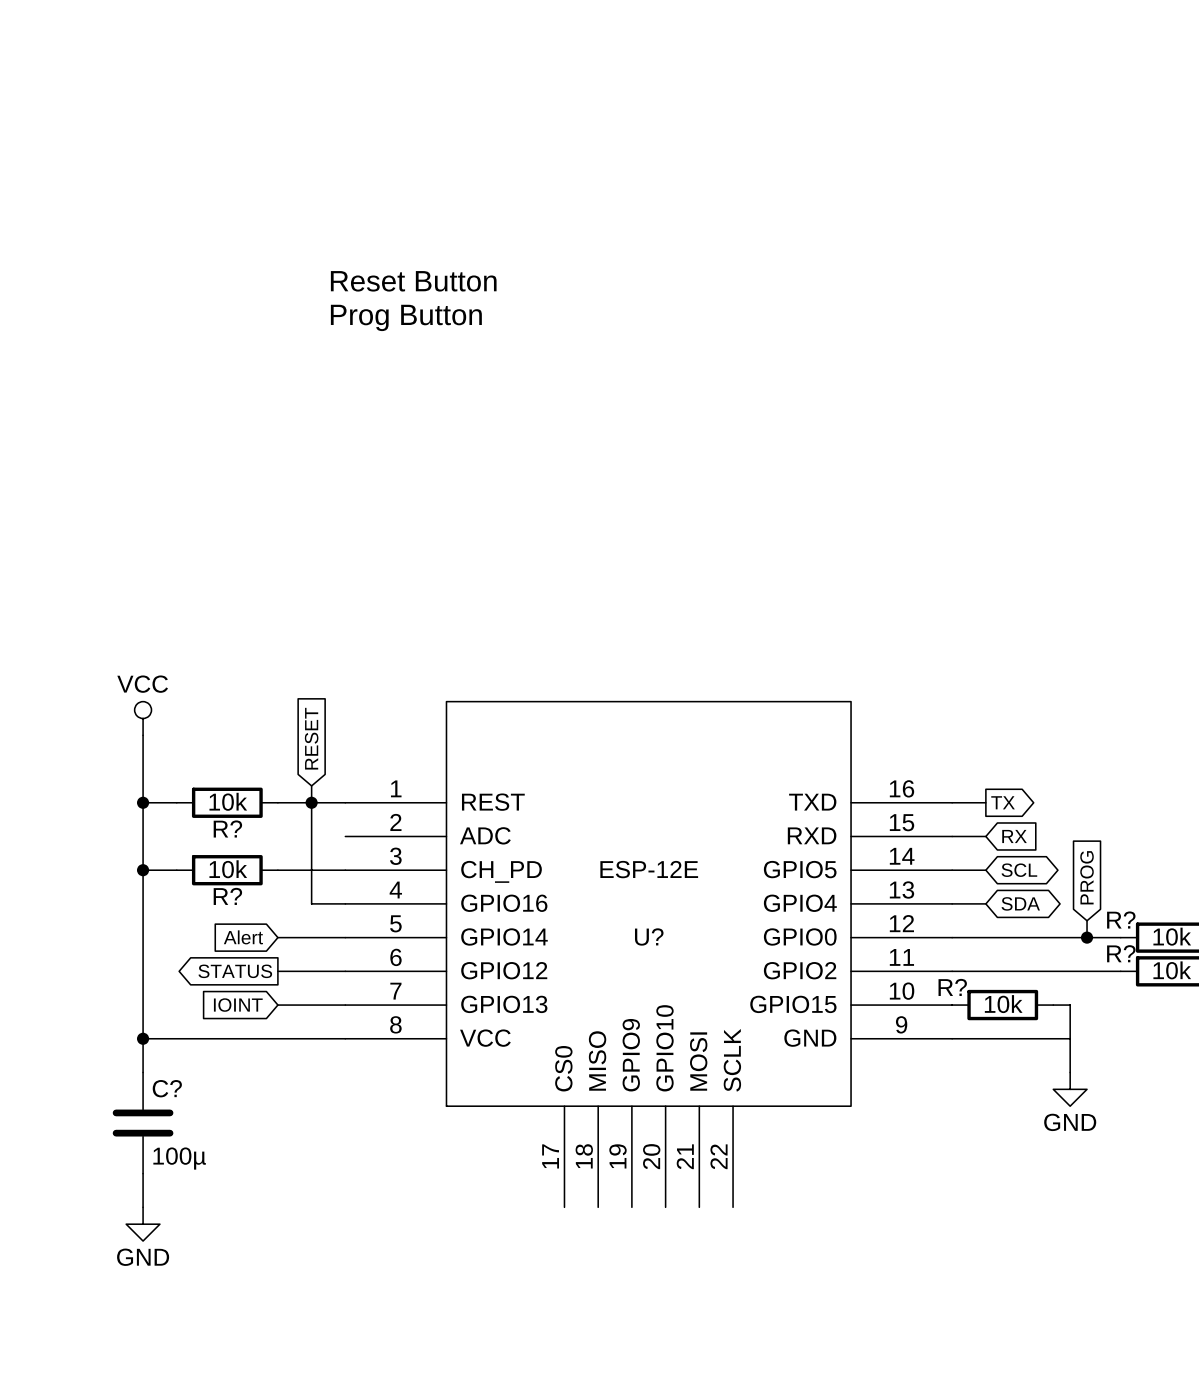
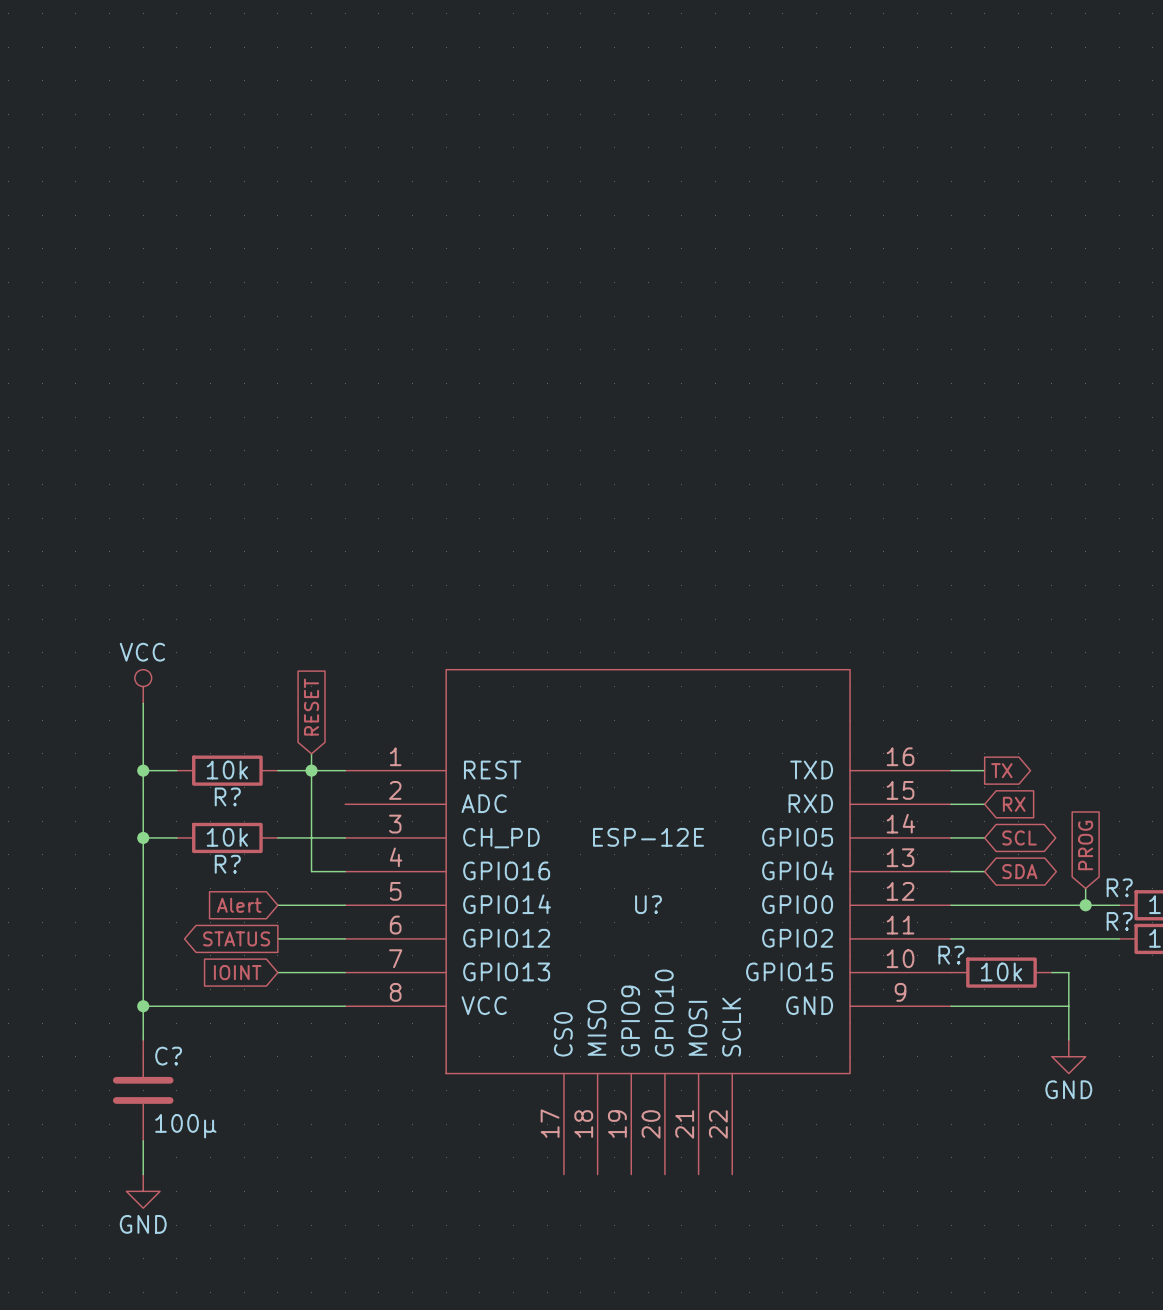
text: Reset Button (413, 281) -> none
text: Prog Button (406, 317) -> none

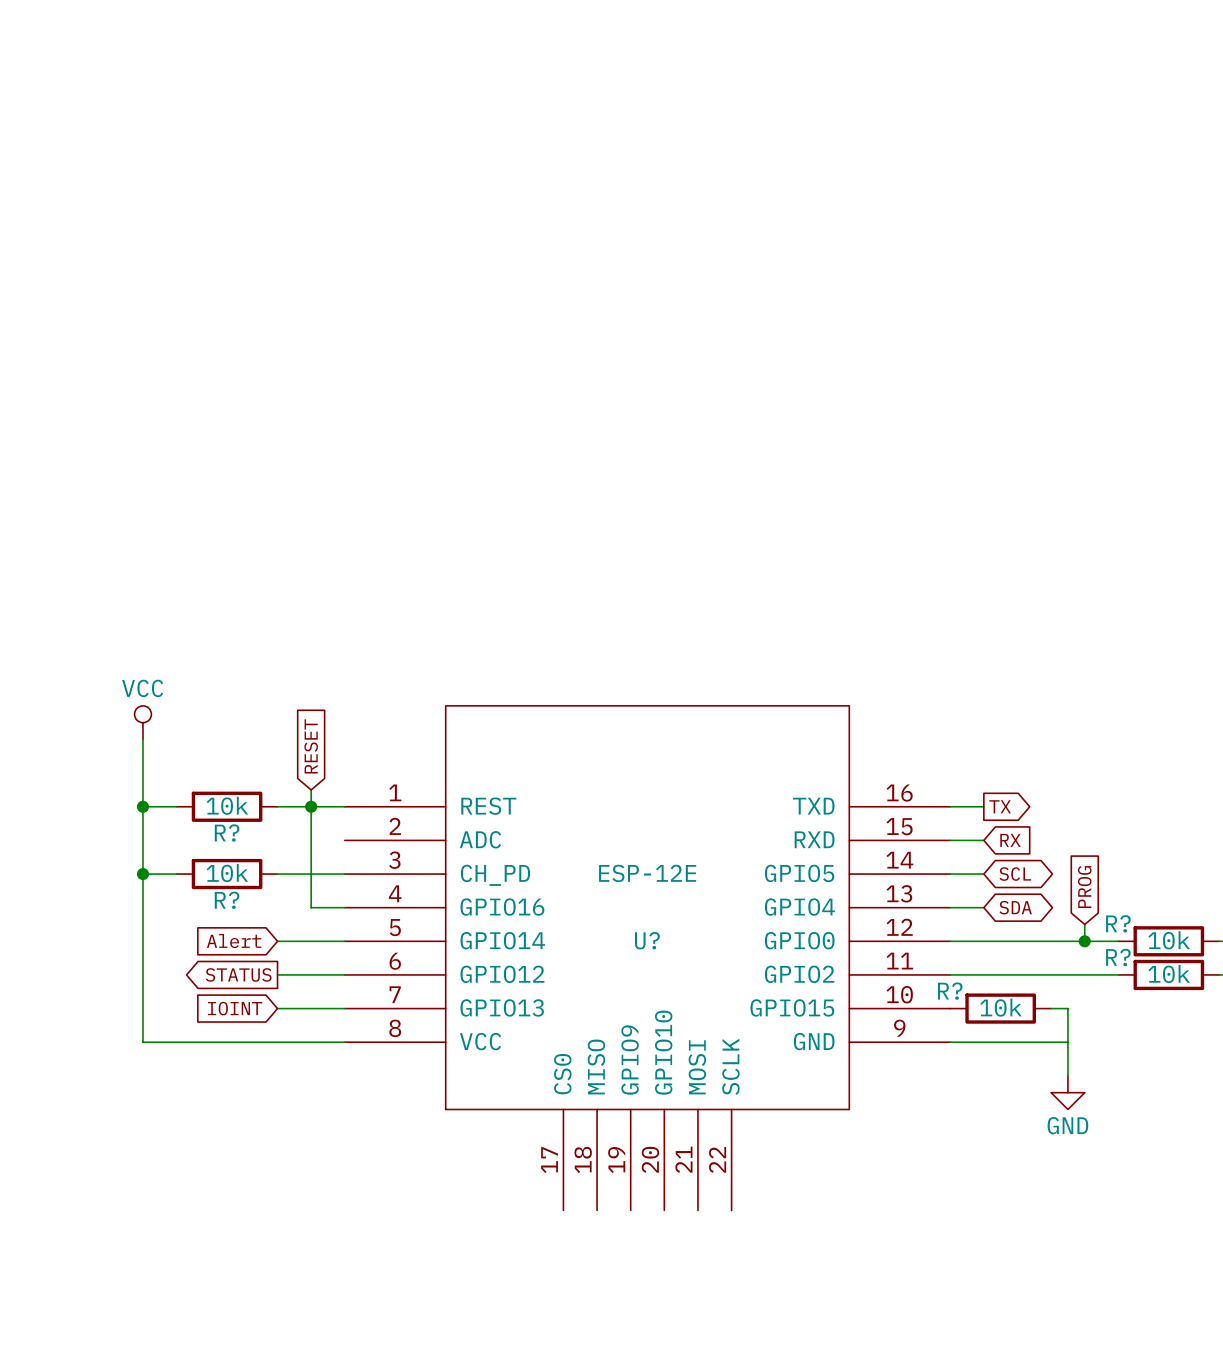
wire: (143, 1006) (143, 1039) -> none
junction: (143, 1006) -> none
C?: 100µ (143, 1090) -> none
wire: (143, 1140) (143, 1174) -> none
power symbol: GND (143, 1191) -> none

